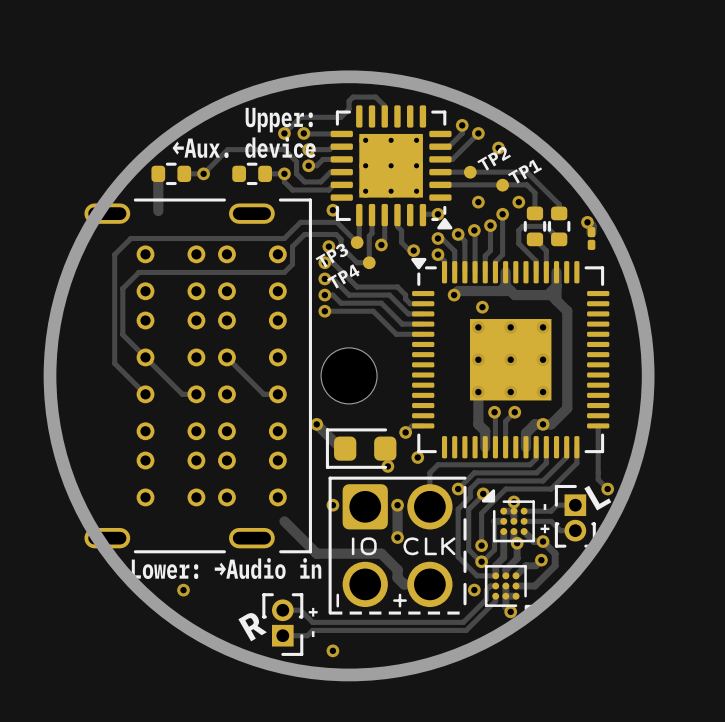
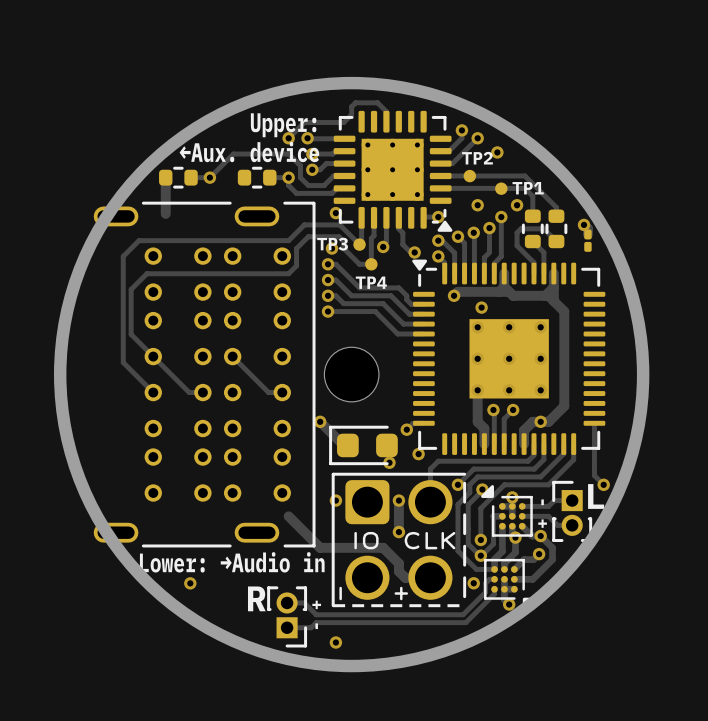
TP2 name rotation: 0° (494, 158) -> 30° clockwise (477, 158)
TP1 name rotation: 0° (525, 171) -> 30° clockwise (528, 188)
TP3 name rotation: 0° (331, 255) -> 30° clockwise (332, 244)
TP4 name rotation: 0° (343, 276) -> 30° clockwise (371, 282)
text rotation: 0° (597, 498) -> 30° clockwise (596, 496)
text rotation: 0° (252, 627) -> 30° clockwise (256, 598)

